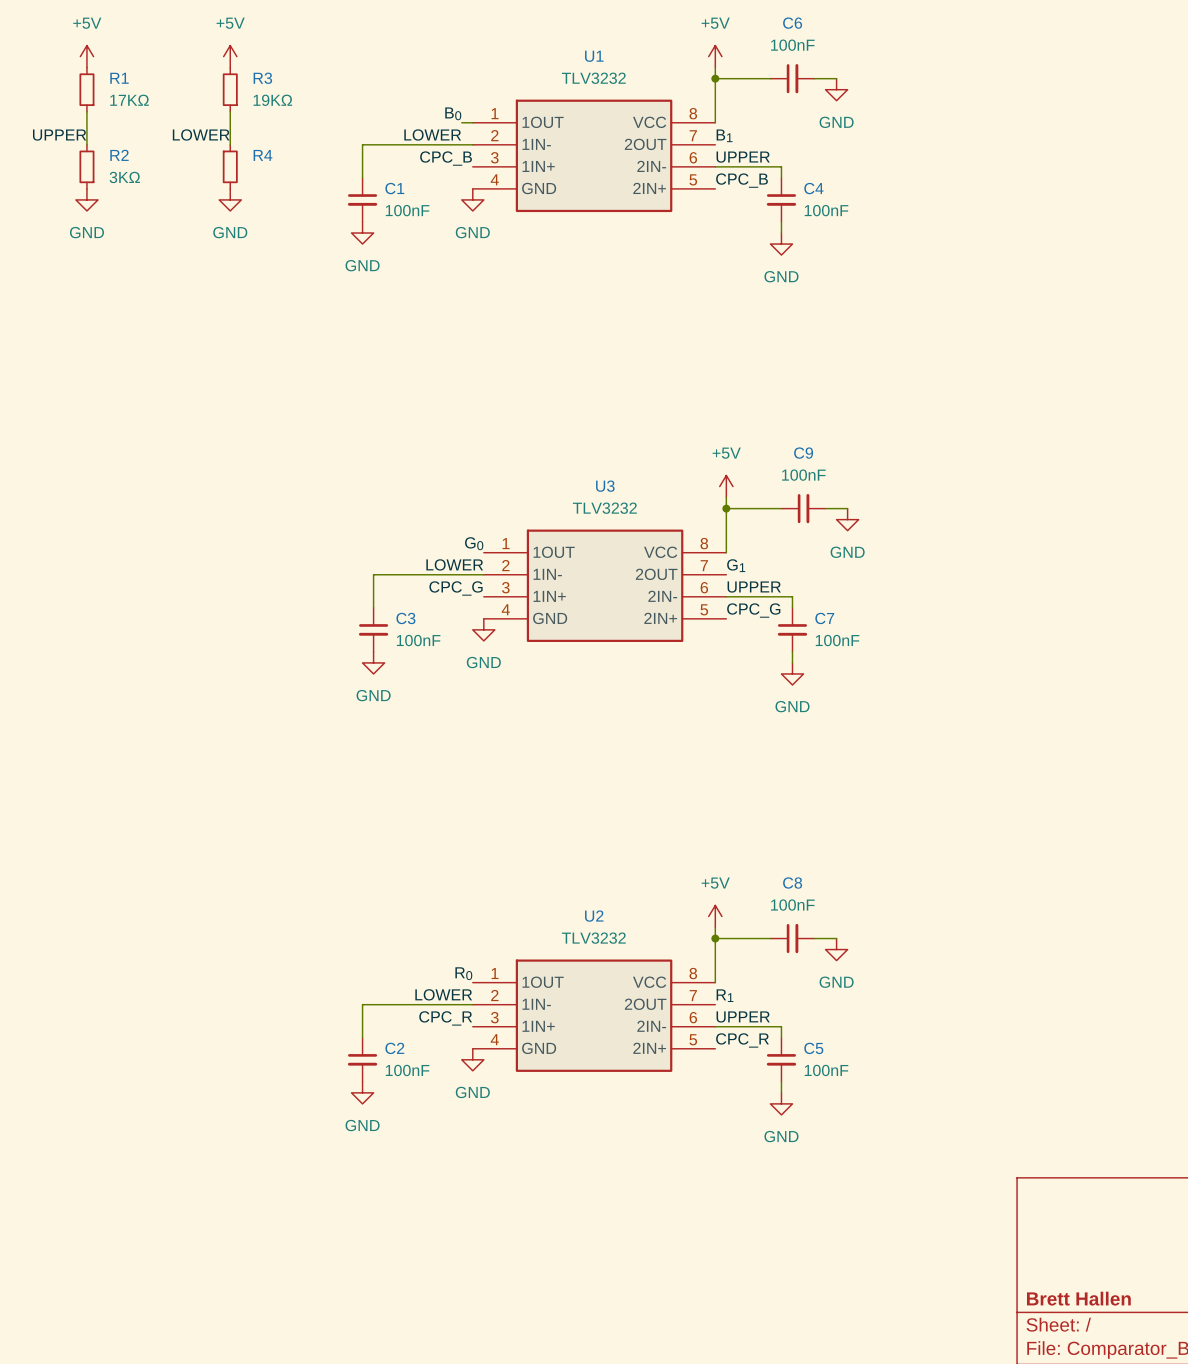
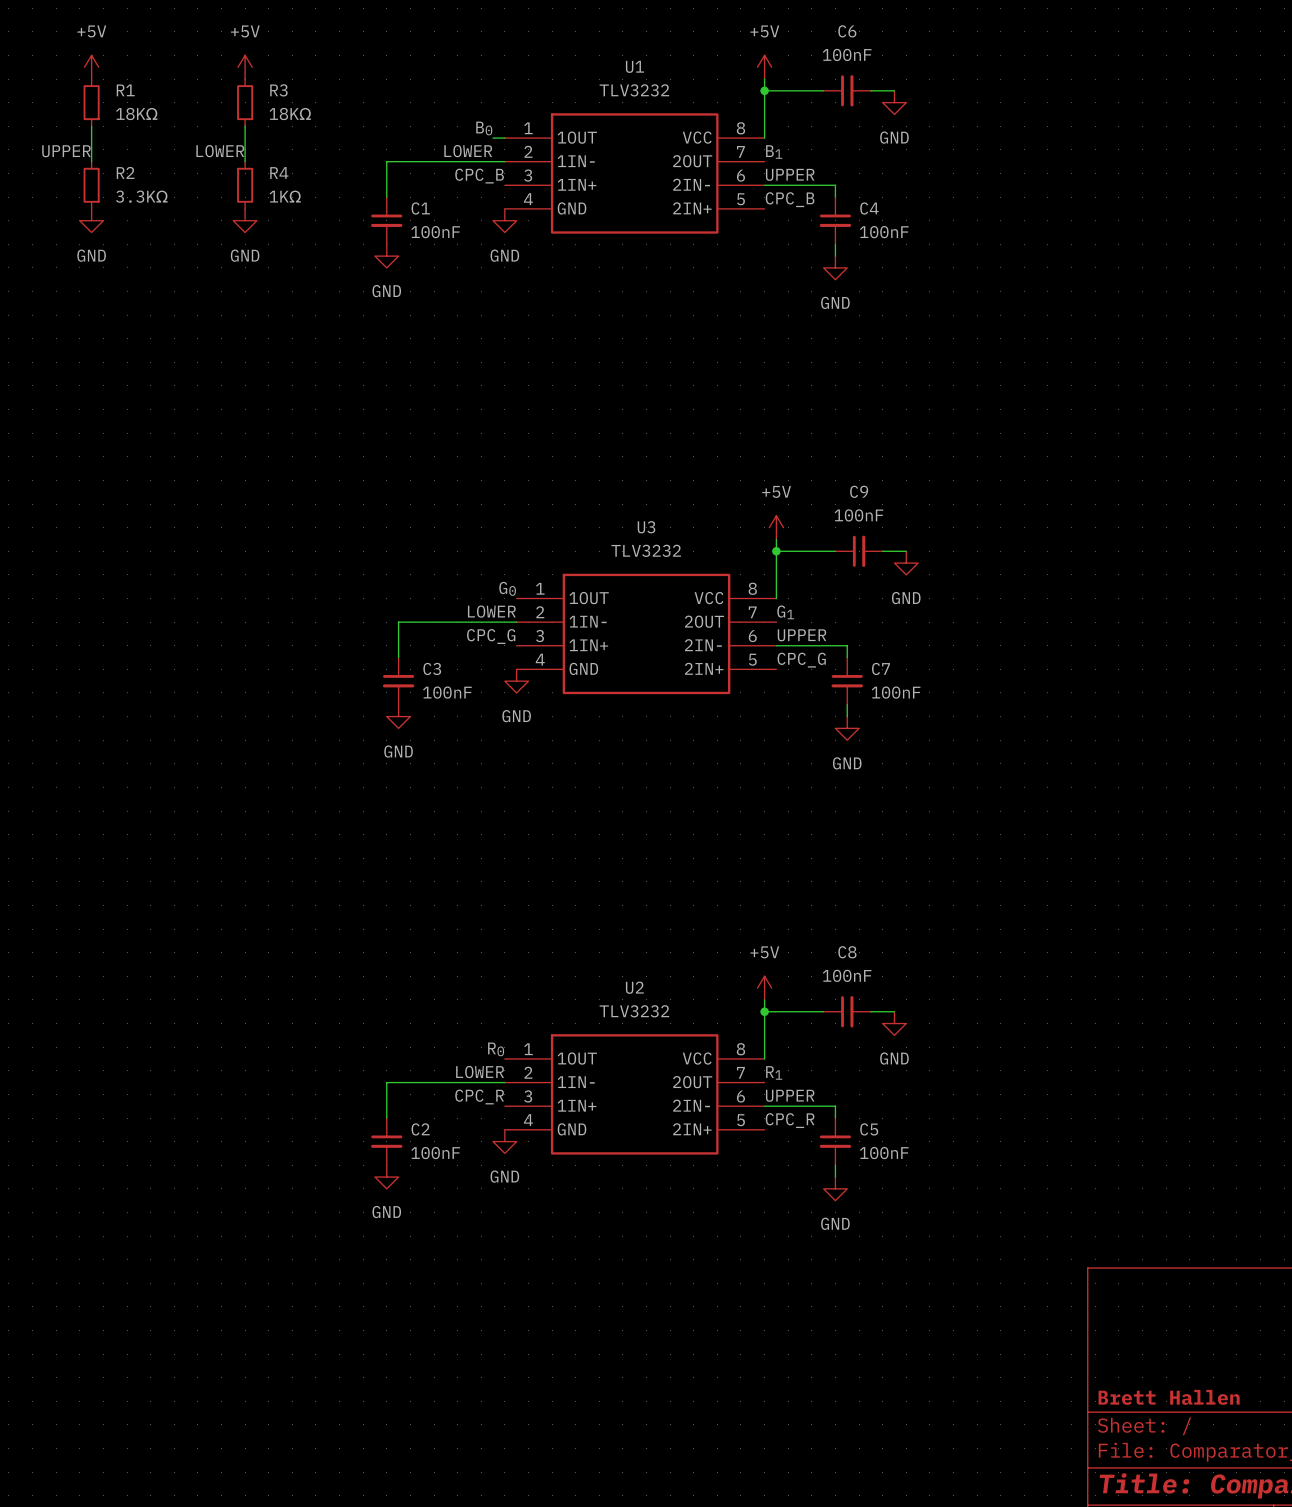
R1 value: 17KΩ (129, 100) -> 18KΩ (136, 114)
R3 value: 19KΩ (272, 100) -> 18KΩ (290, 114)
R2 value: 3KΩ (124, 177) -> 3.3KΩ (141, 196)
R4 value: none -> 1KΩ (285, 196)

